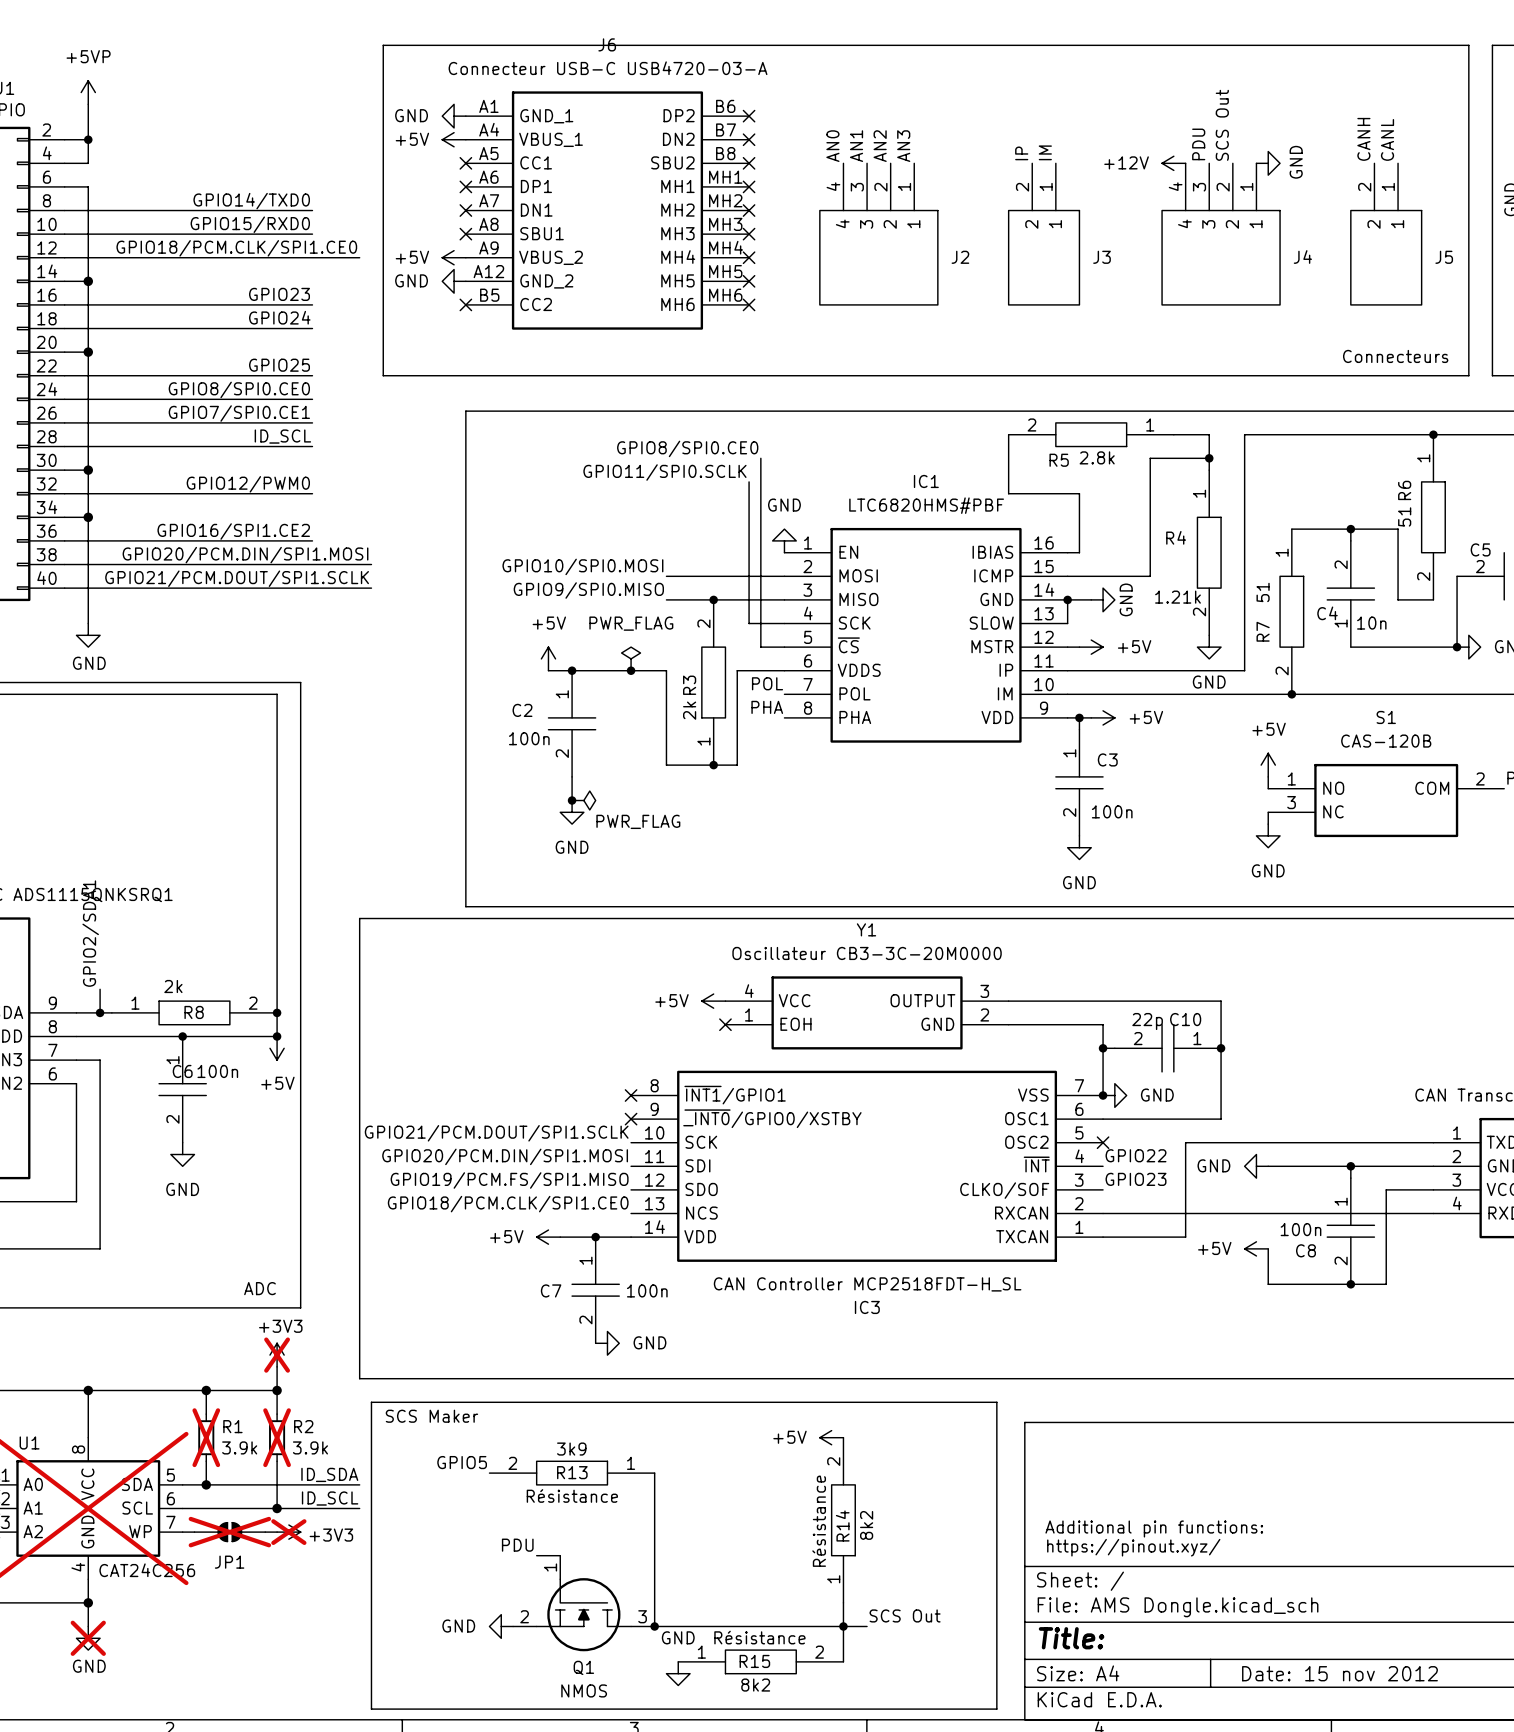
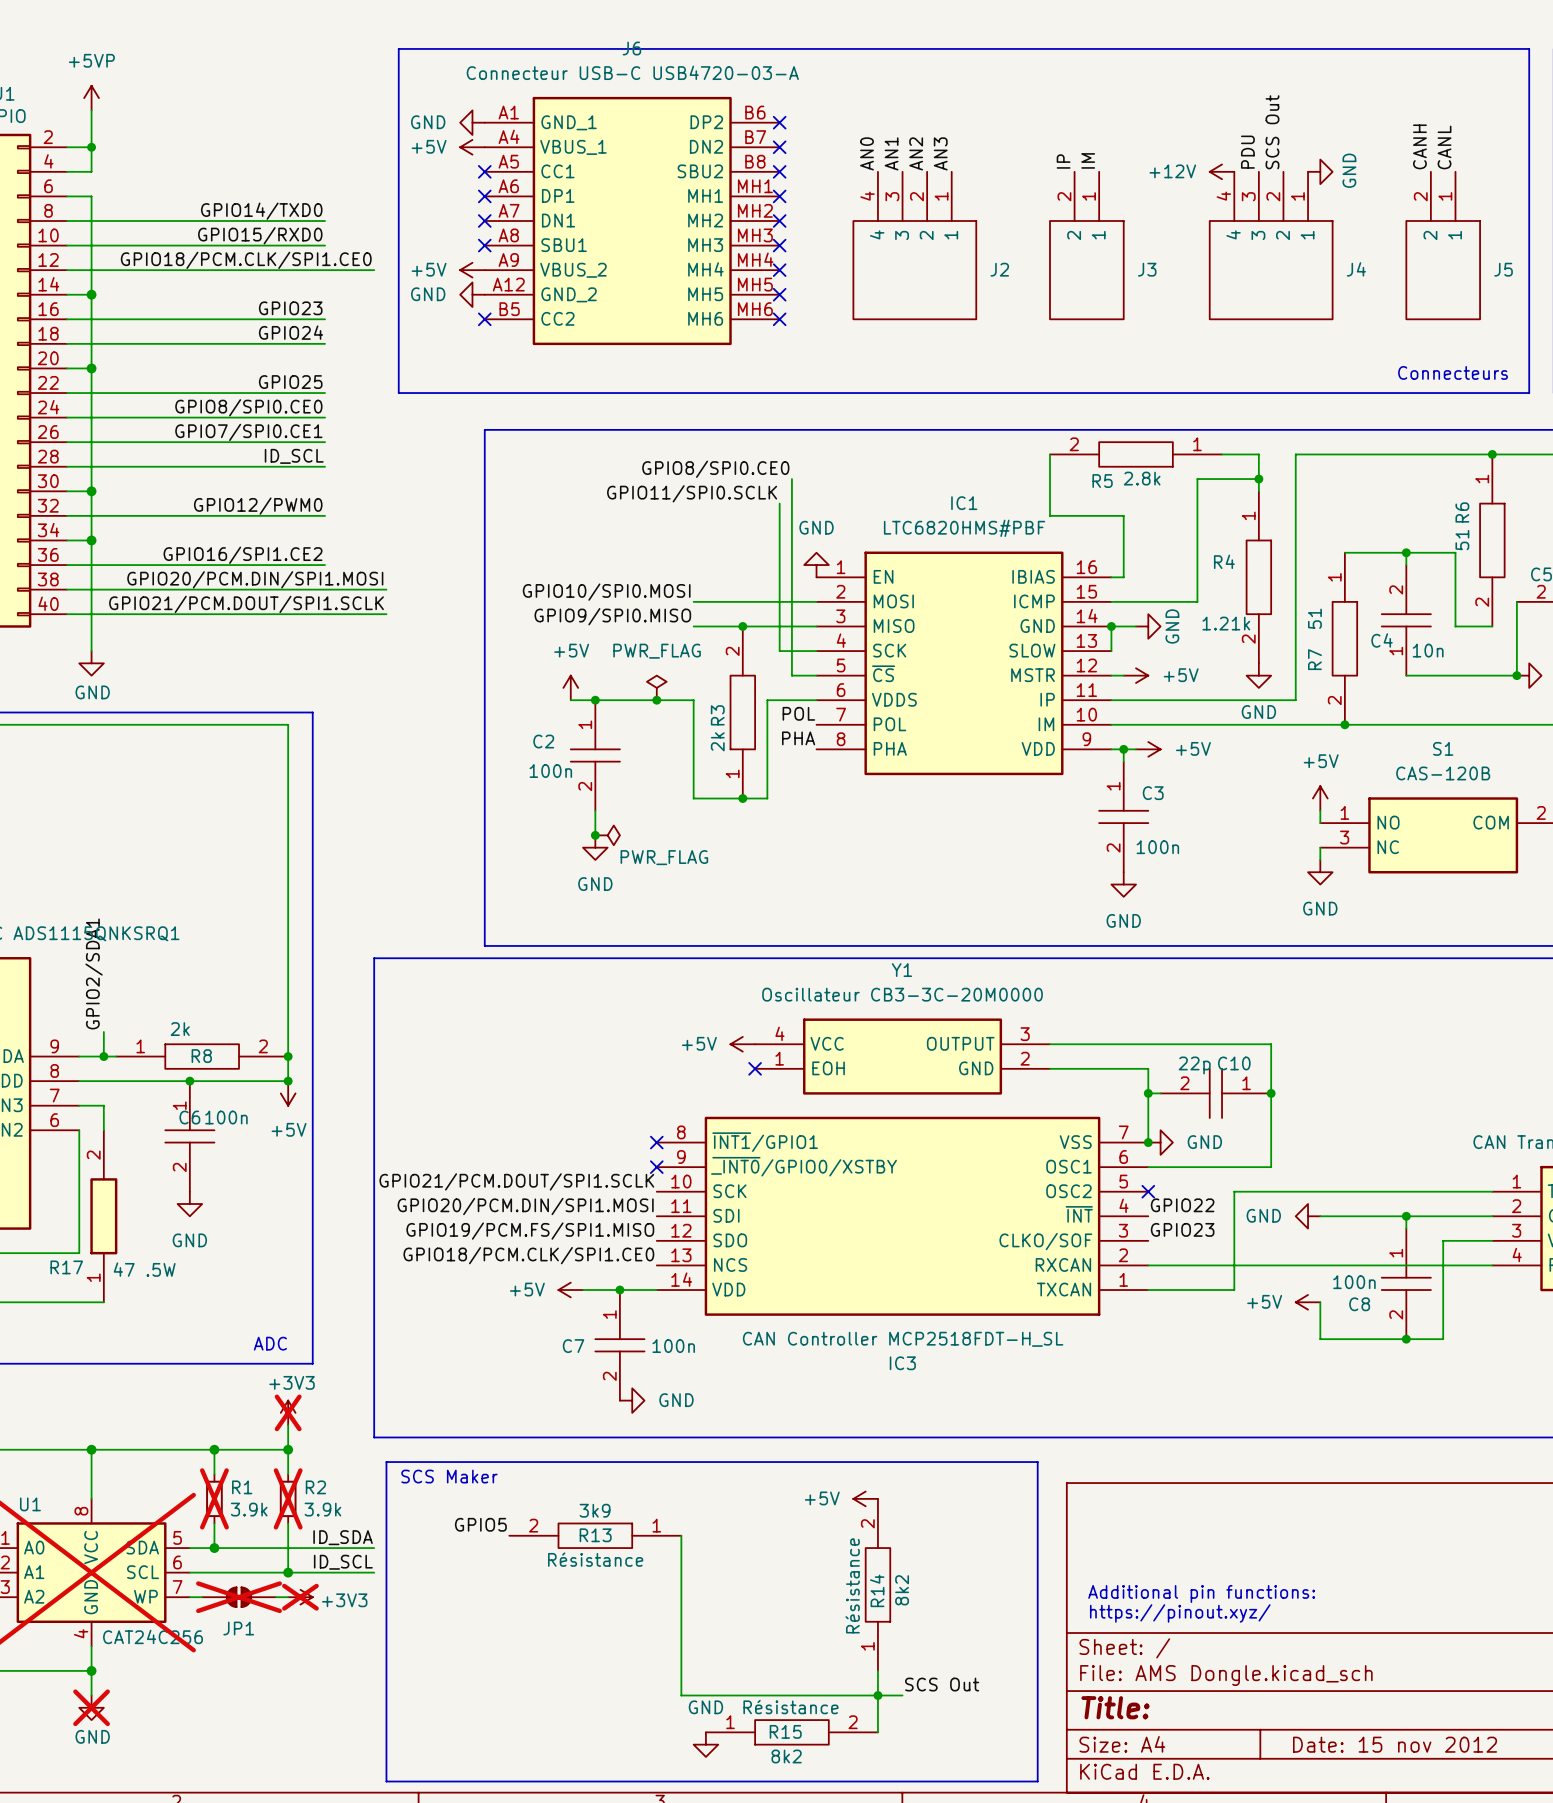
R17: none -> 47 .5W (103, 1216)
label: PDU (517, 1545) -> none
wire: (536, 1555) (560, 1555) -> none
Q1: (583, 1603) -> none
power symbol: GND (501, 1626) -> none
junction: (654, 1626) -> none

